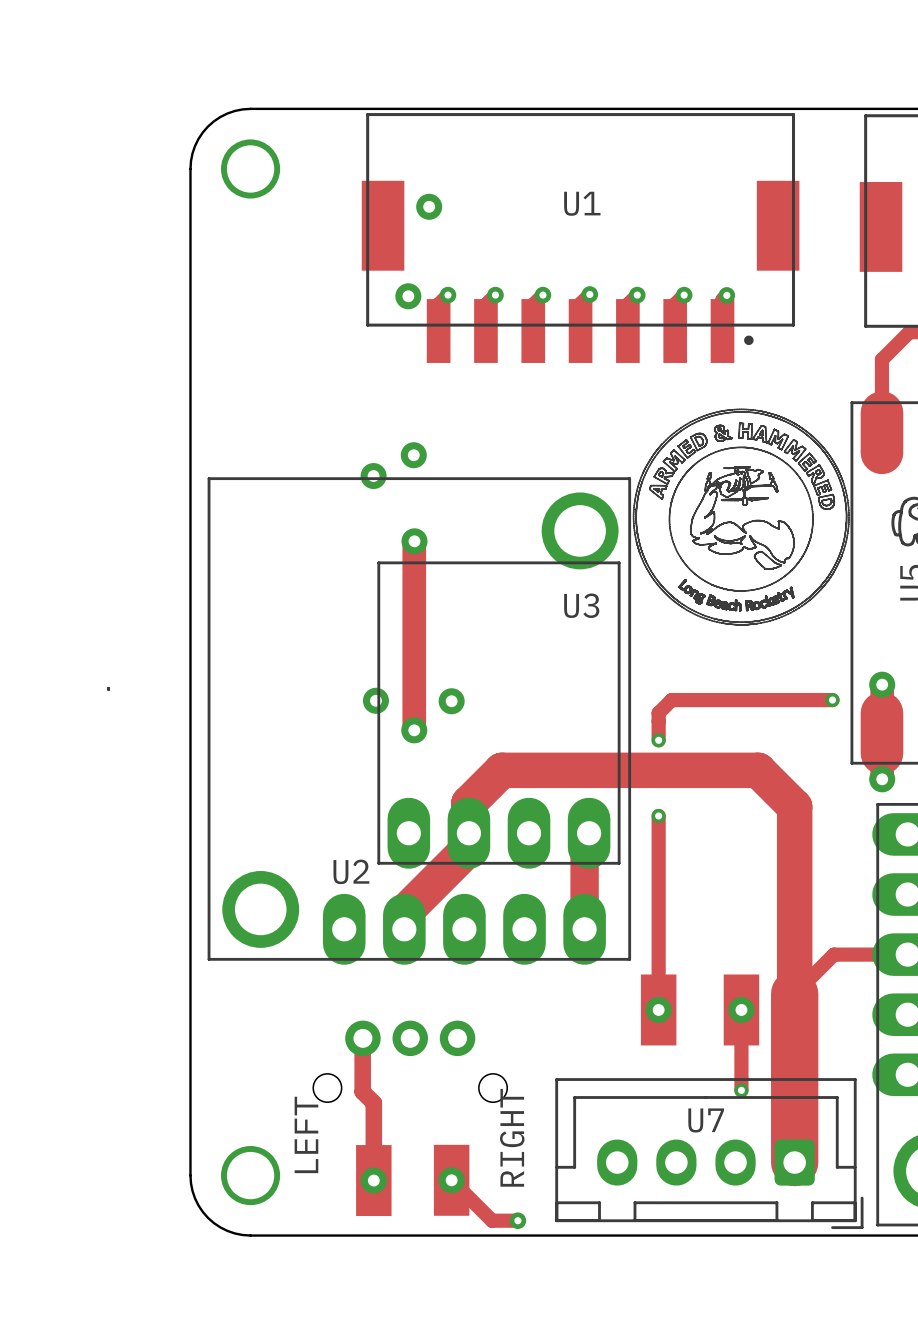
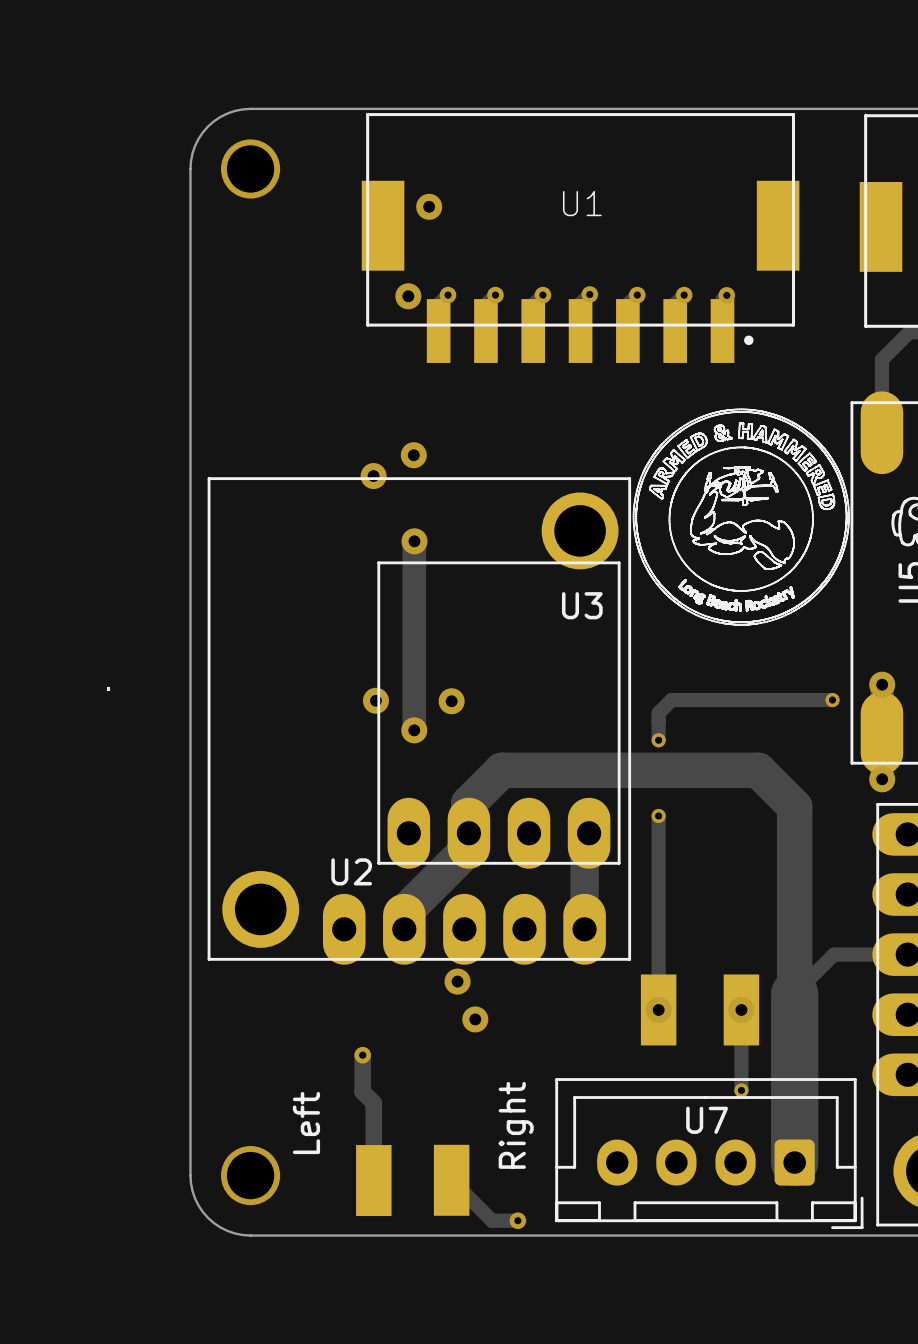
via: none -> (457, 981)
via: none -> (475, 1019)
via: none -> (362, 1055)
part: (410, 1061) -> none
LEFT name: LEFT (306, 1134) -> Left (306, 1123)
RIGHT name: RIGHT (512, 1137) -> Right (516, 1125)
via: (373, 1180) -> none
via: (451, 1180) -> none

